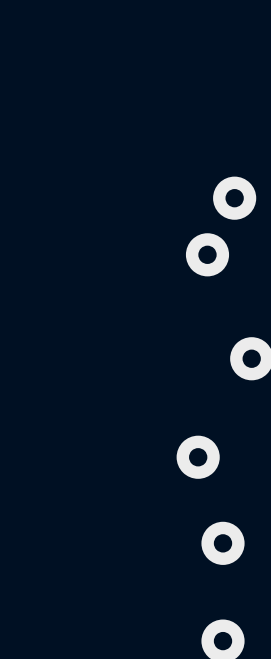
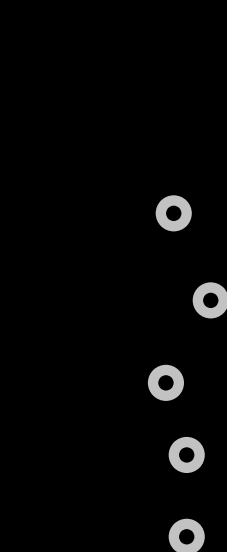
via: (234, 198) -> none

